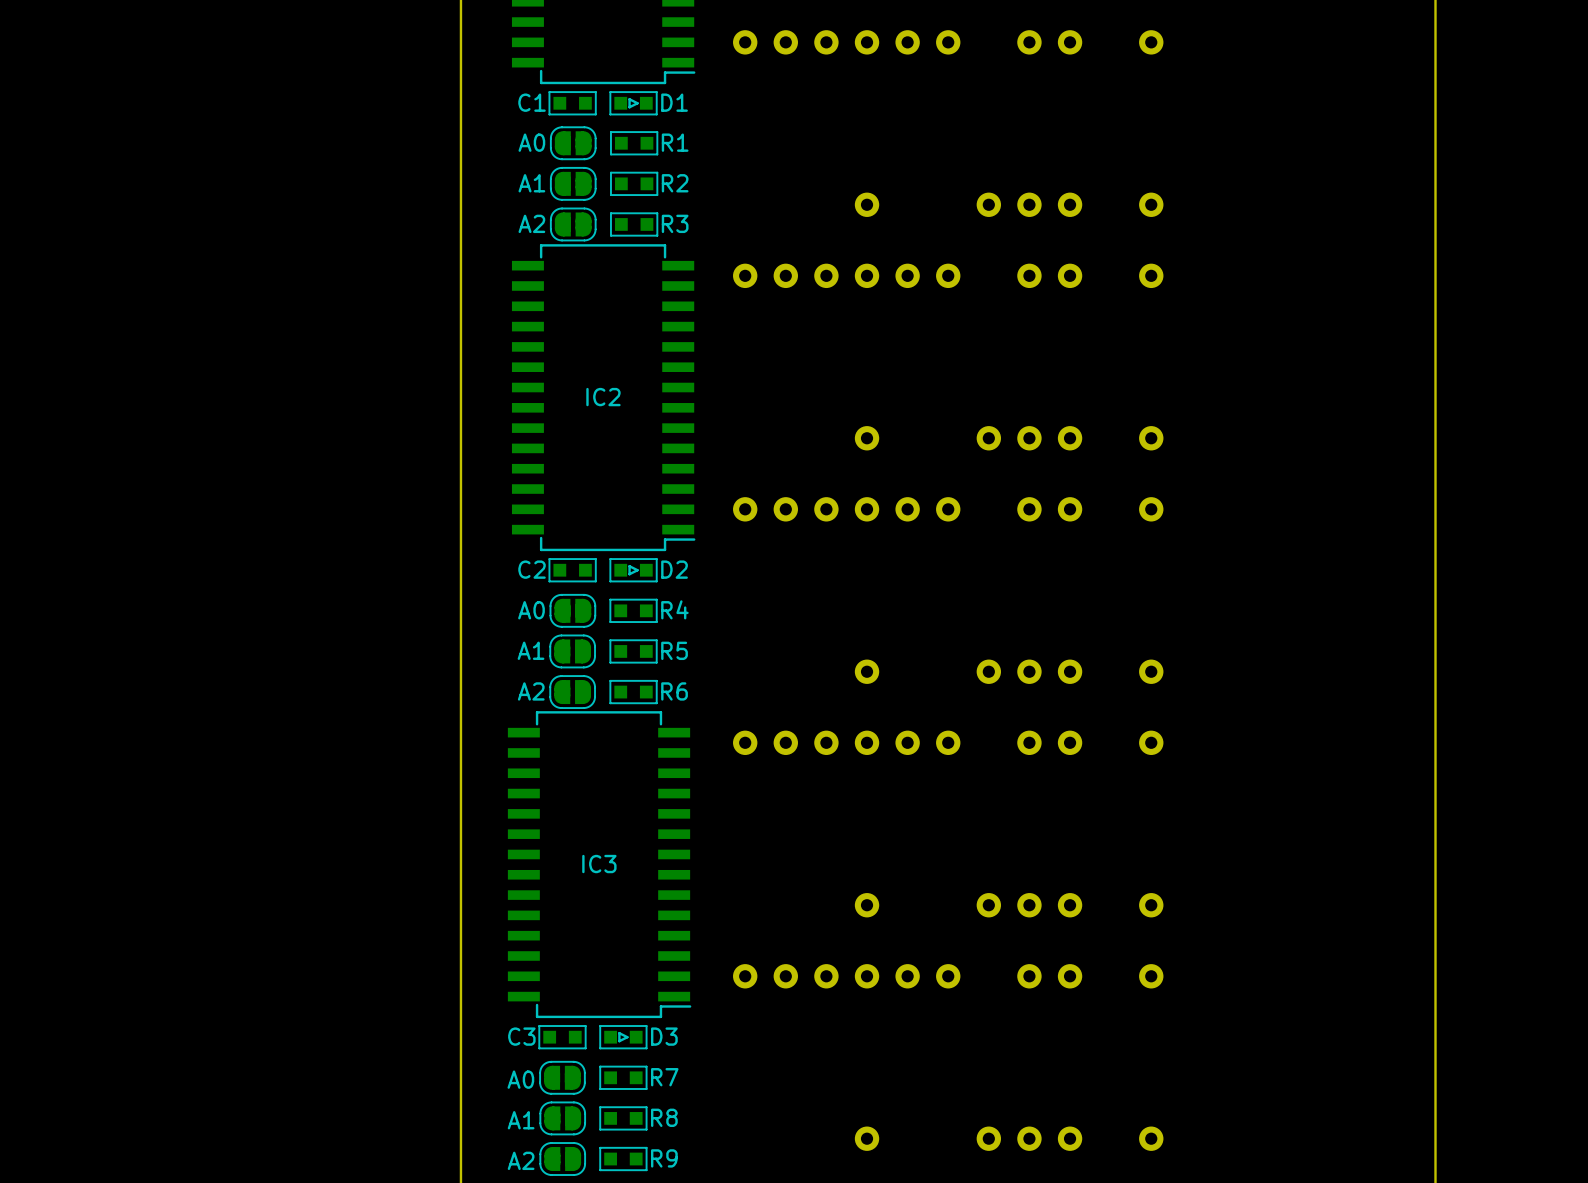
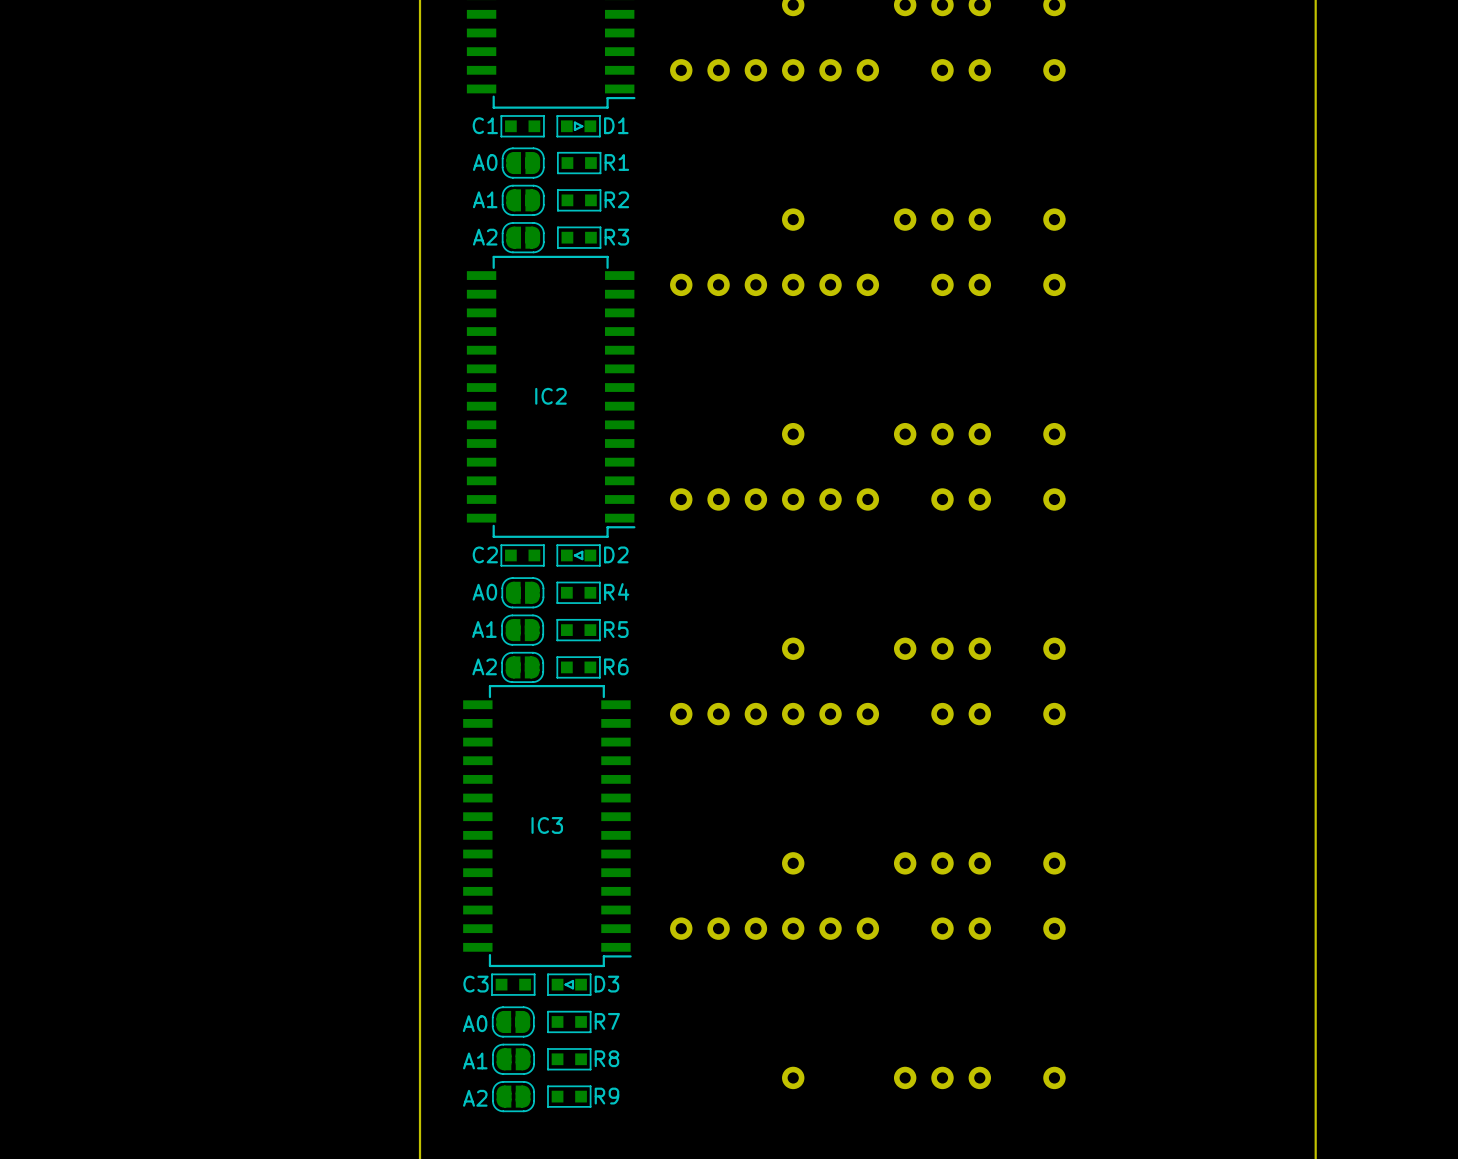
D2 rotation: 0° (633, 570) -> 180° (578, 555)
D3 rotation: 0° (623, 1037) -> 180° (569, 984)

